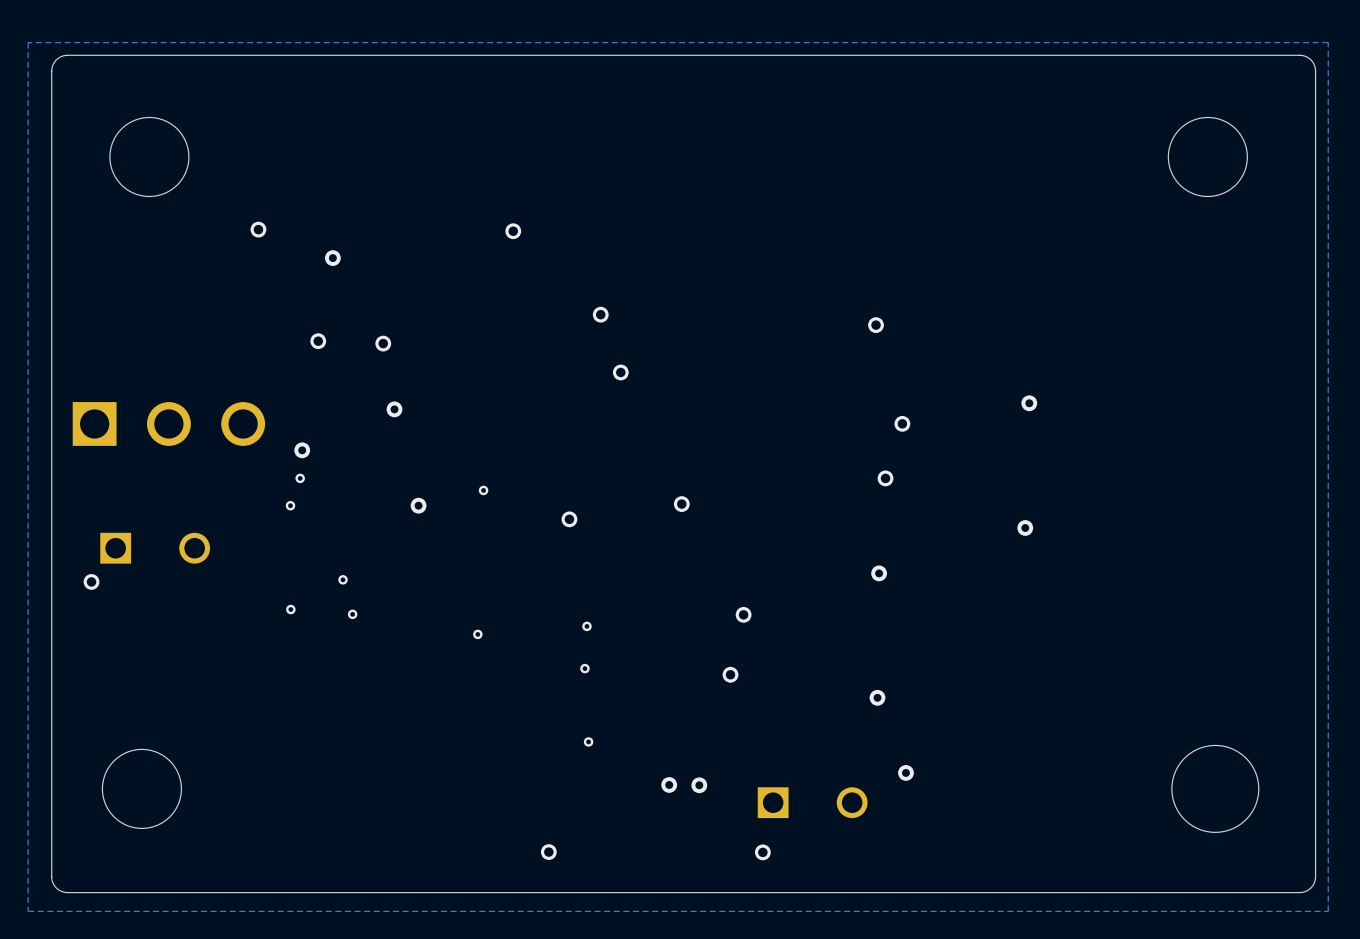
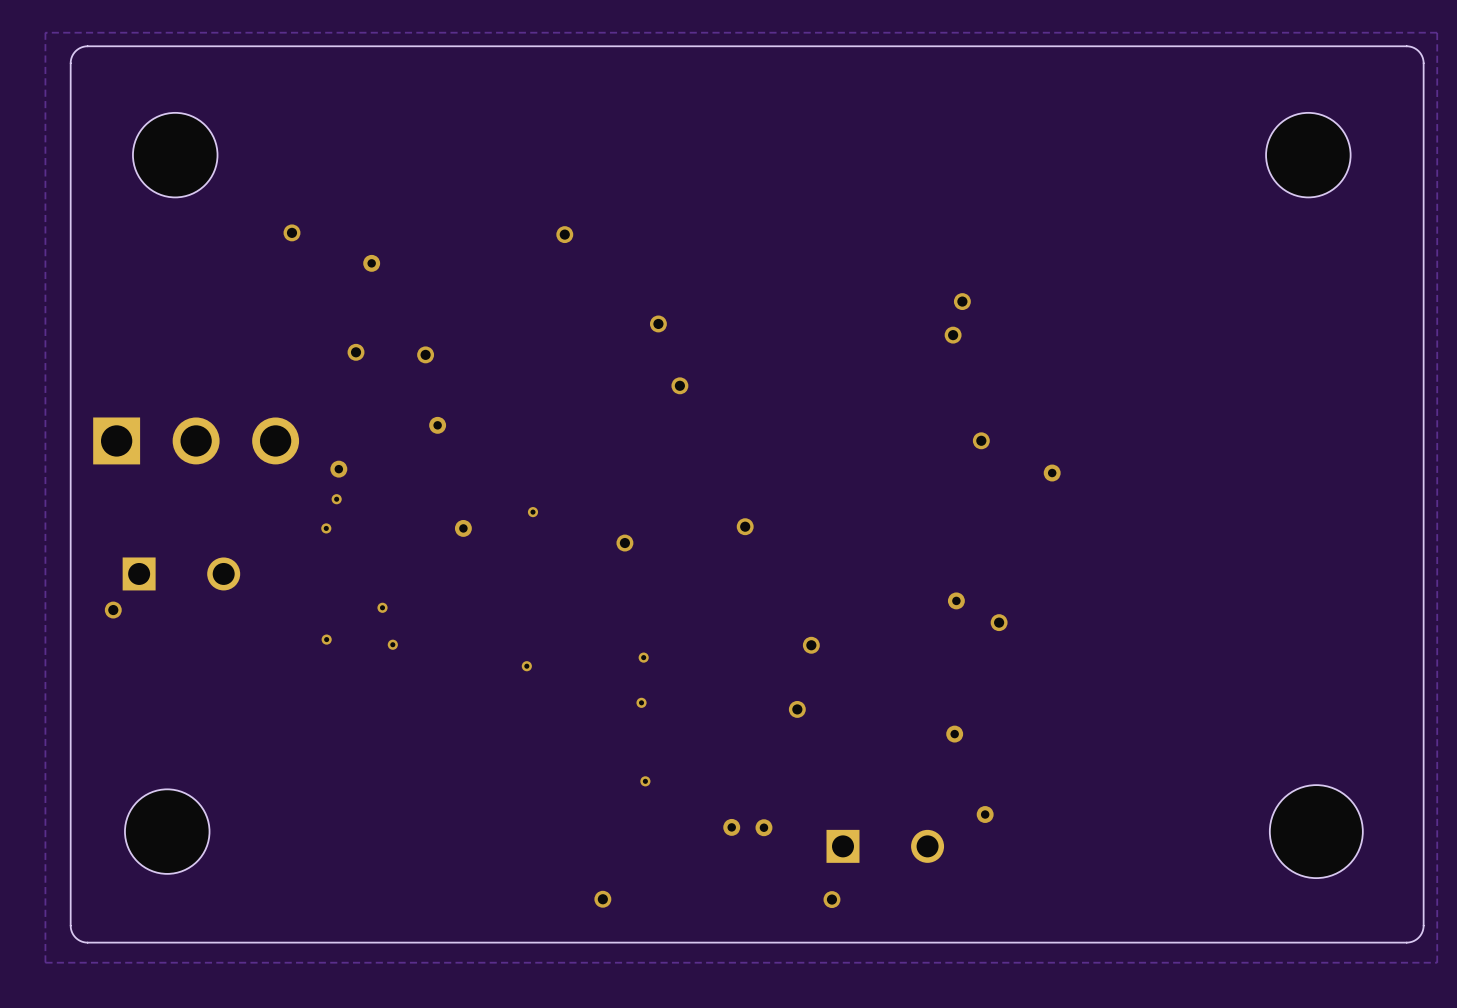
via: none -> (962, 301)
via: (1029, 403) -> none
via: none -> (1052, 473)
via: (885, 478) -> none
via: (1025, 527) -> none
via: none -> (999, 622)

